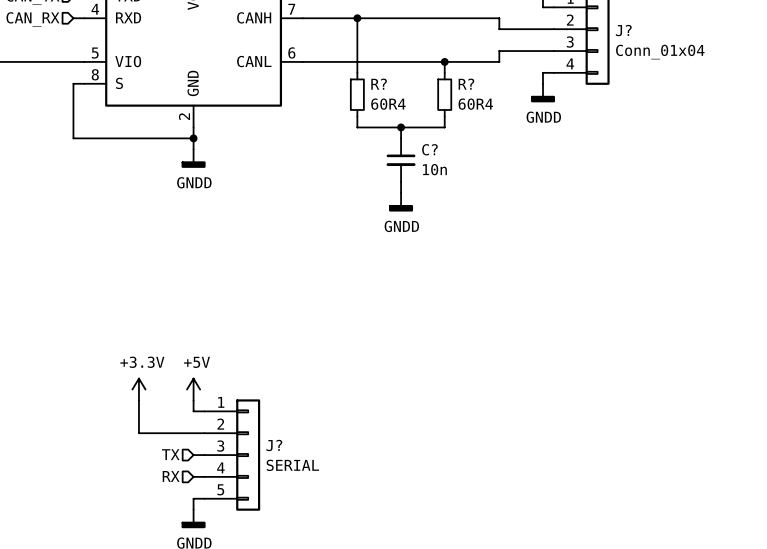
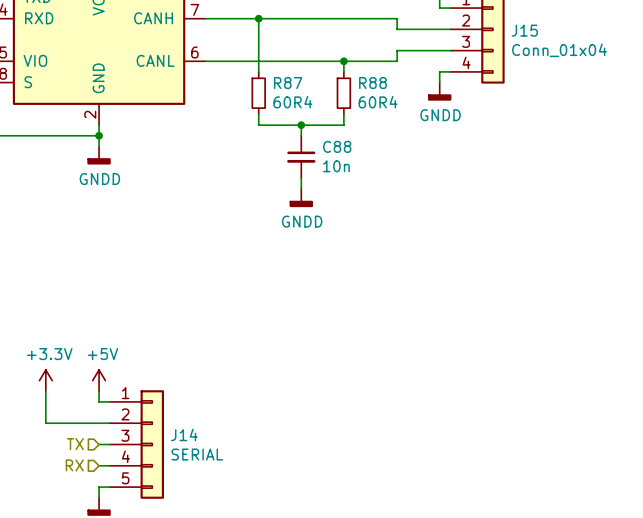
J? name: J? (623, 30) -> J15 (524, 30)
R? name: R? (379, 84) -> R87 (288, 83)
R? name: R? (466, 84) -> R88 (373, 83)
C? name: C? (429, 149) -> C88 (337, 146)
J? name: J? (274, 445) -> J14 (184, 434)

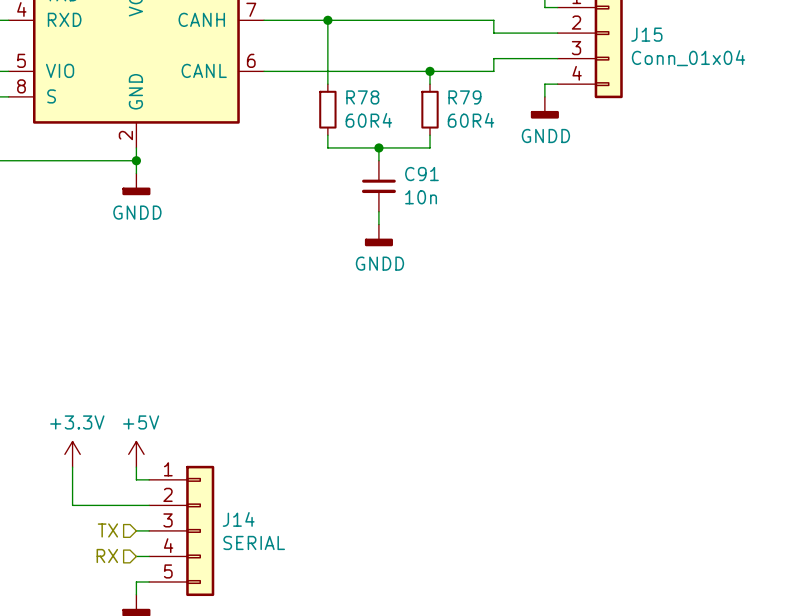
R87 name: R87 (288, 83) -> R78 (362, 97)
R88 name: R88 (373, 83) -> R79 (464, 97)
C88 name: C88 (337, 146) -> C91 (421, 174)

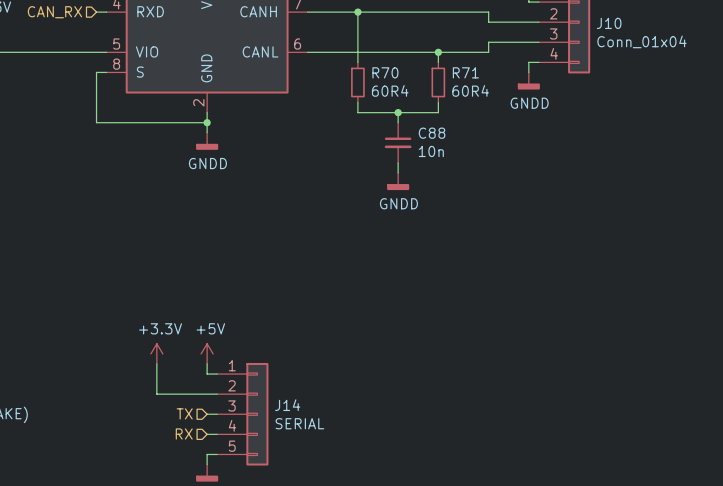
J15 name: J15 (646, 34) -> J10 (609, 23)
R78 name: R78 (362, 97) -> R70 (385, 72)
R79 name: R79 (464, 97) -> R71 (465, 72)
C91 name: C91 (421, 174) -> C88 (432, 133)

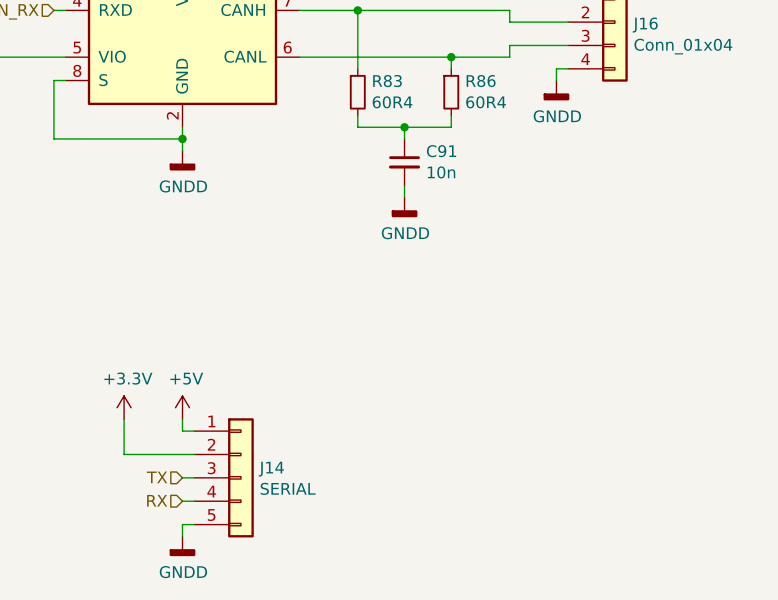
J10 name: J10 (609, 23) -> J16 (645, 25)
R70 name: R70 (385, 72) -> R83 (387, 81)
R71 name: R71 (465, 72) -> R86 (481, 81)
C88 name: C88 (432, 133) -> C91 (441, 151)

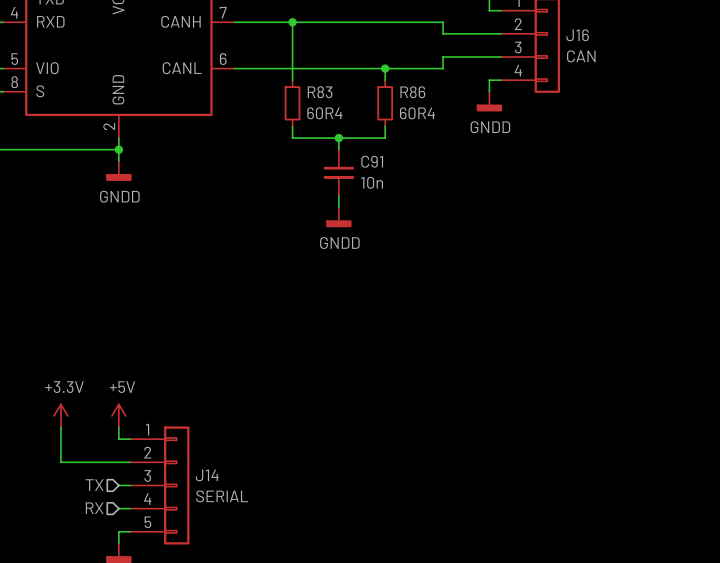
J16 value: Conn_01x04 (683, 46) -> CAN (581, 56)

